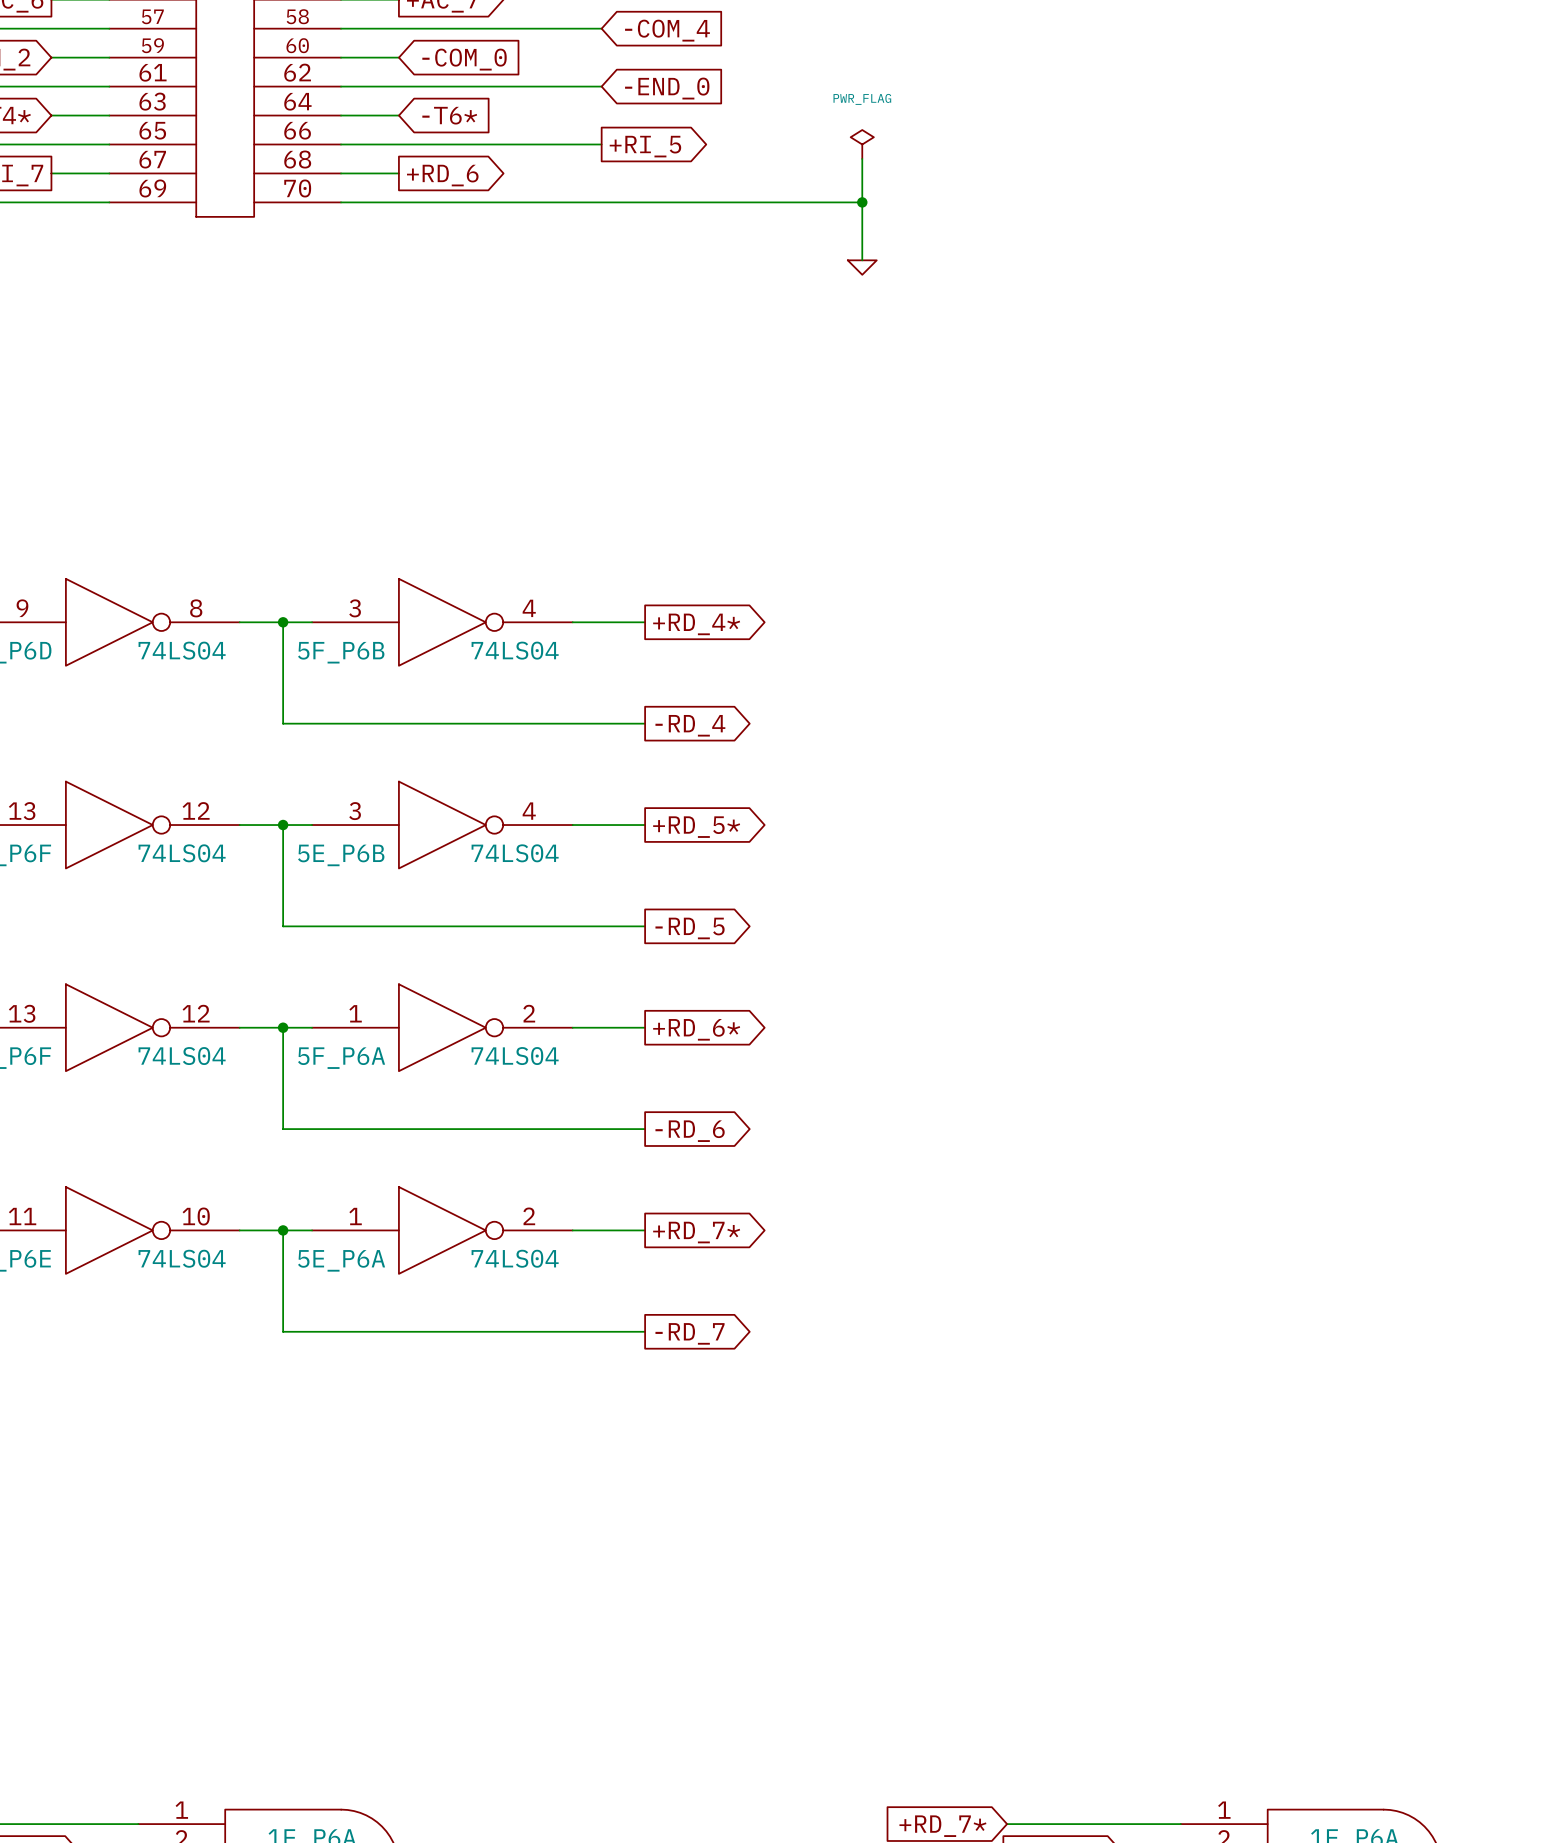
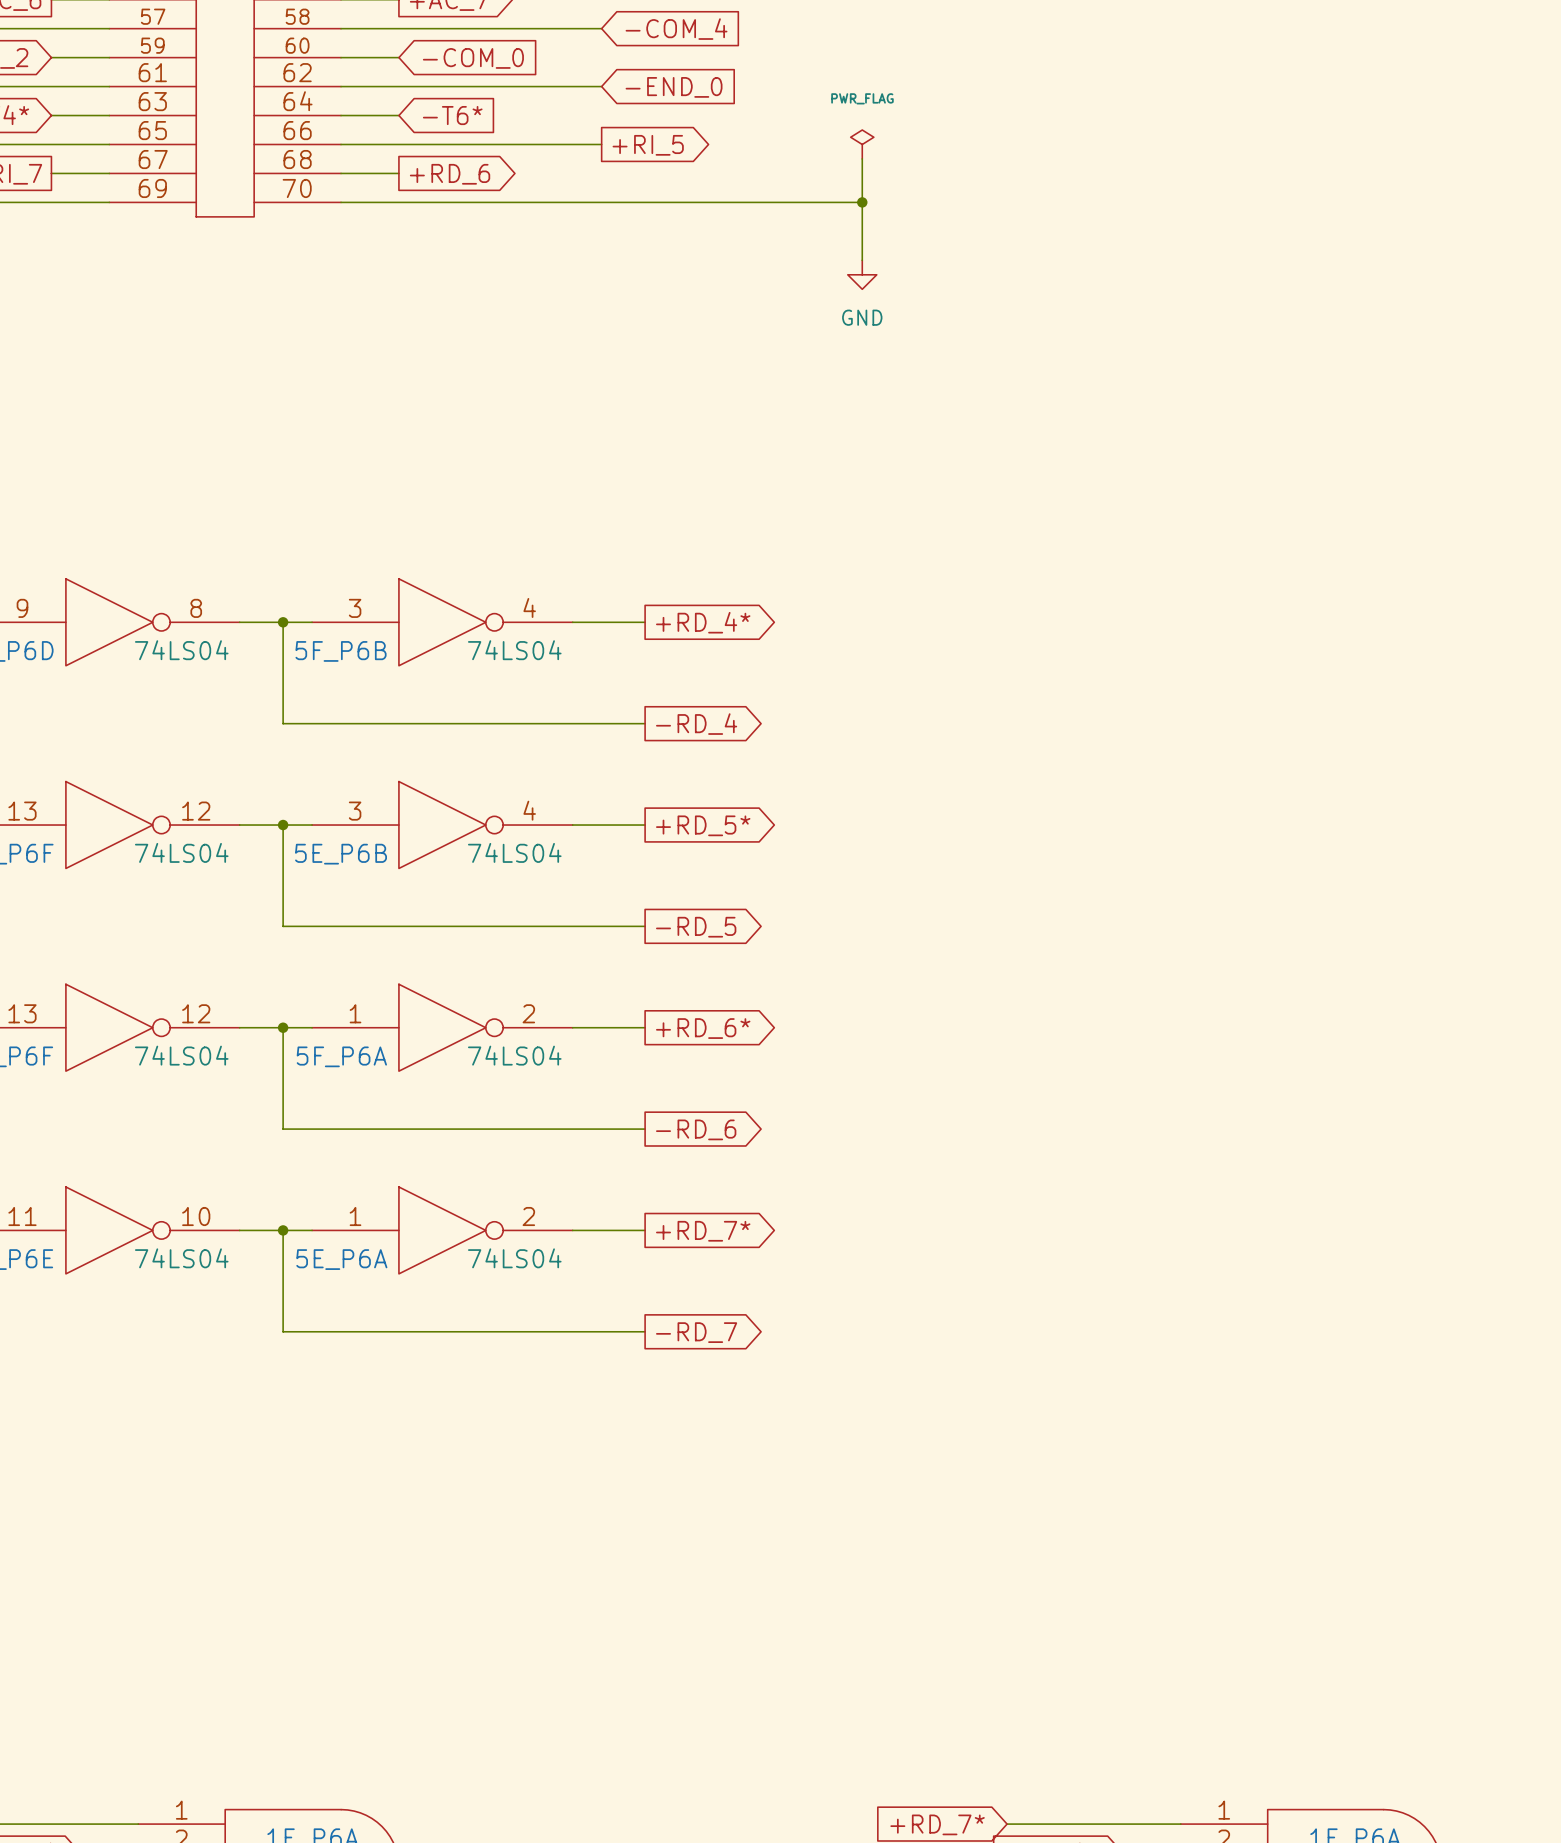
power symbol shape: [847, 260, 877, 275] -> [847, 260, 877, 290]
power symbol text: none -> GND (862, 317)

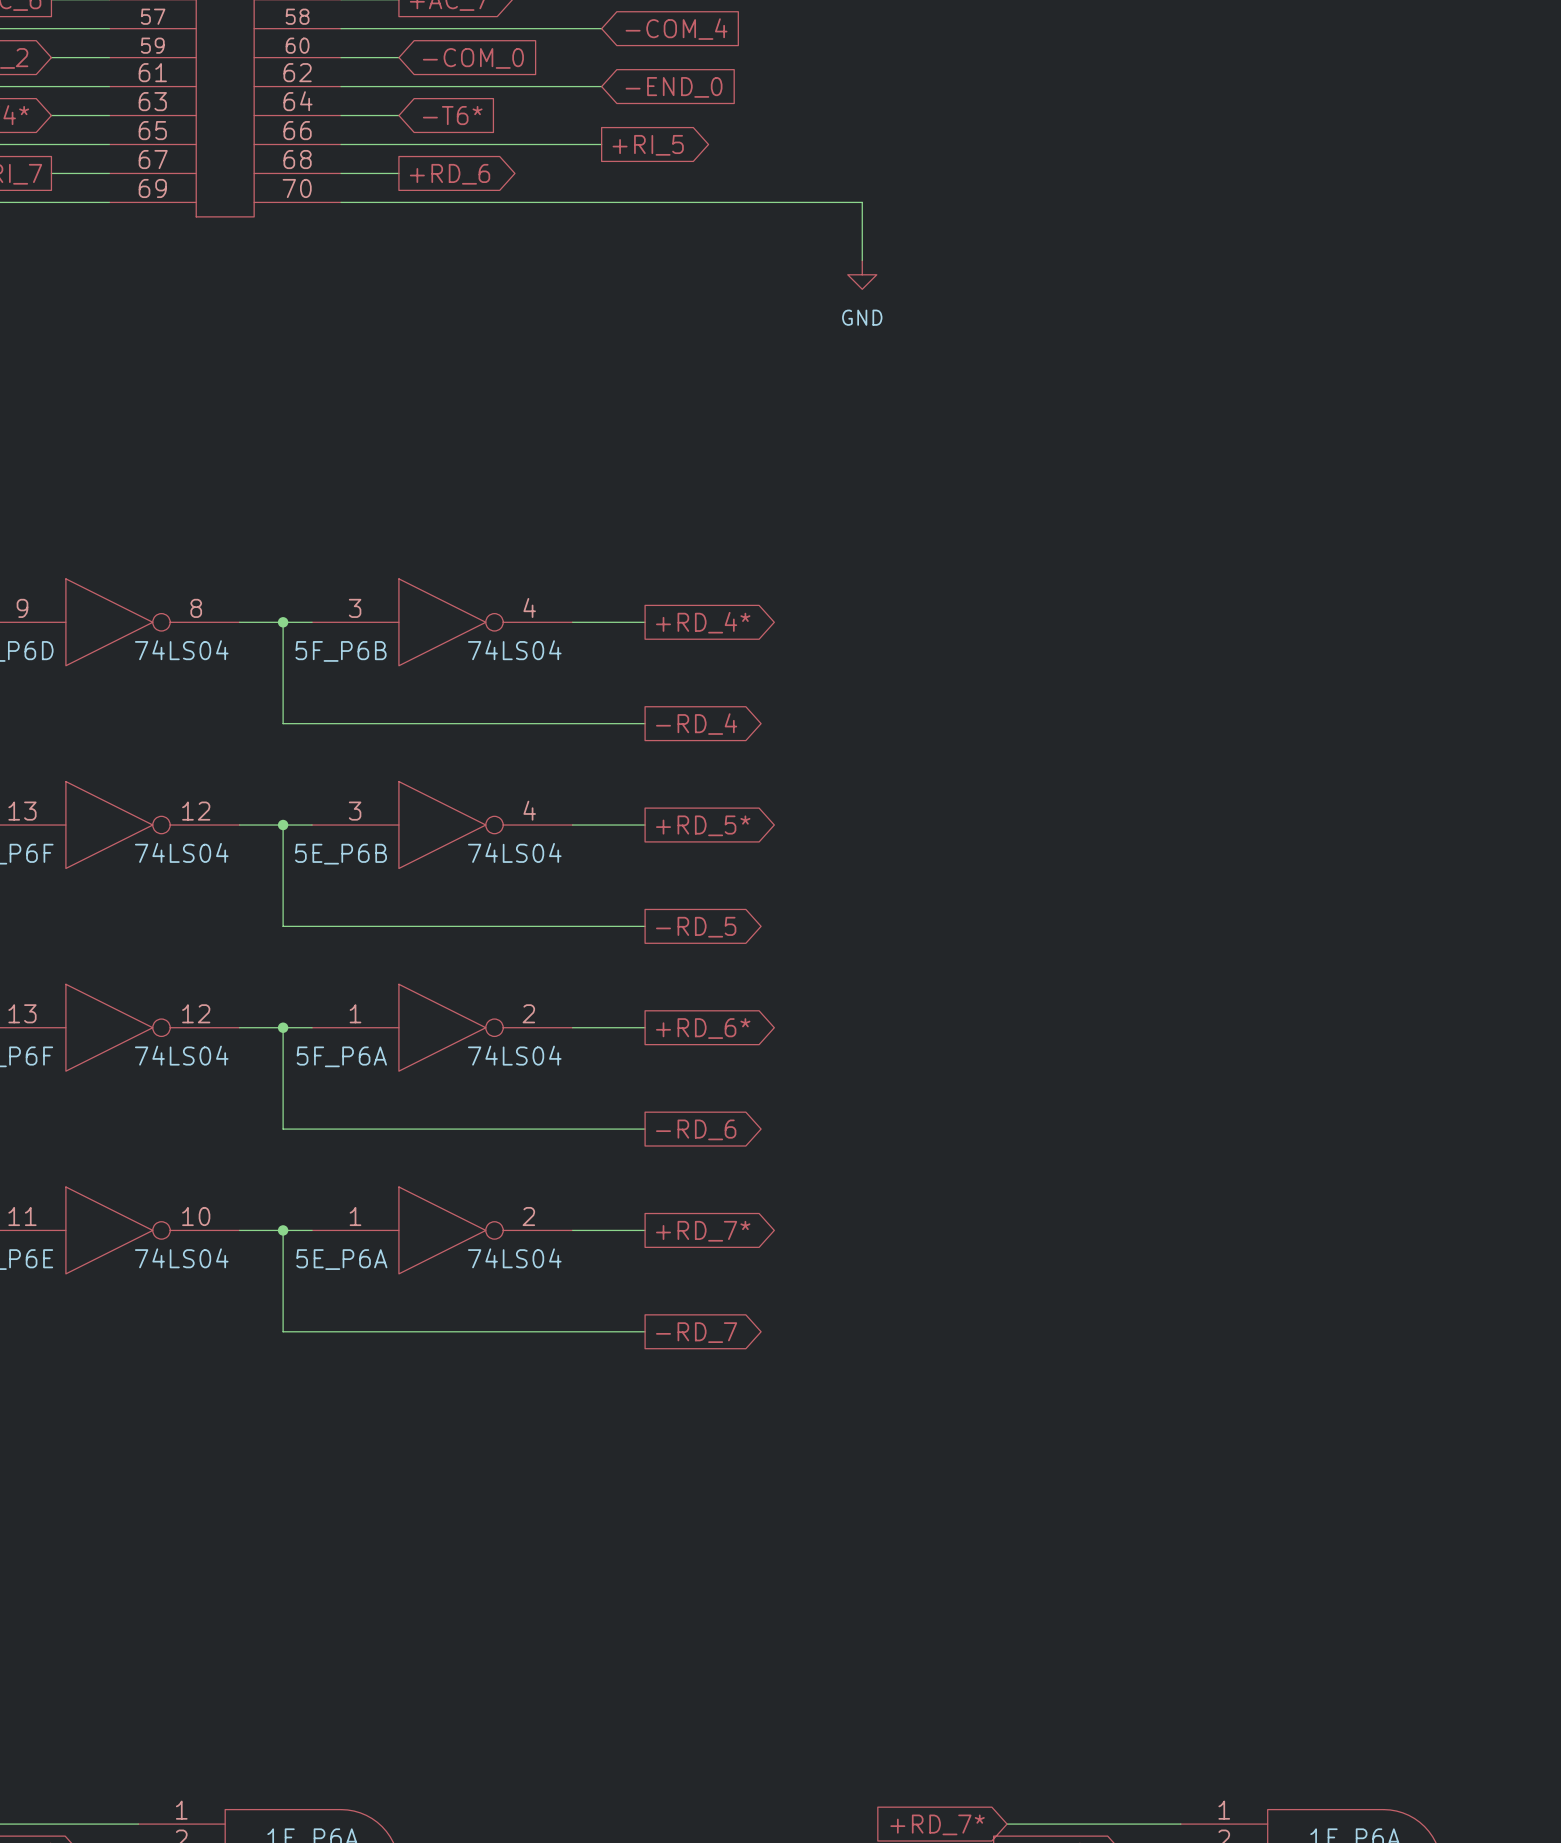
power symbol: PWR_FLAG (862, 144) -> none
wire: (862, 158) (862, 202) -> none
junction: (862, 202) -> none

